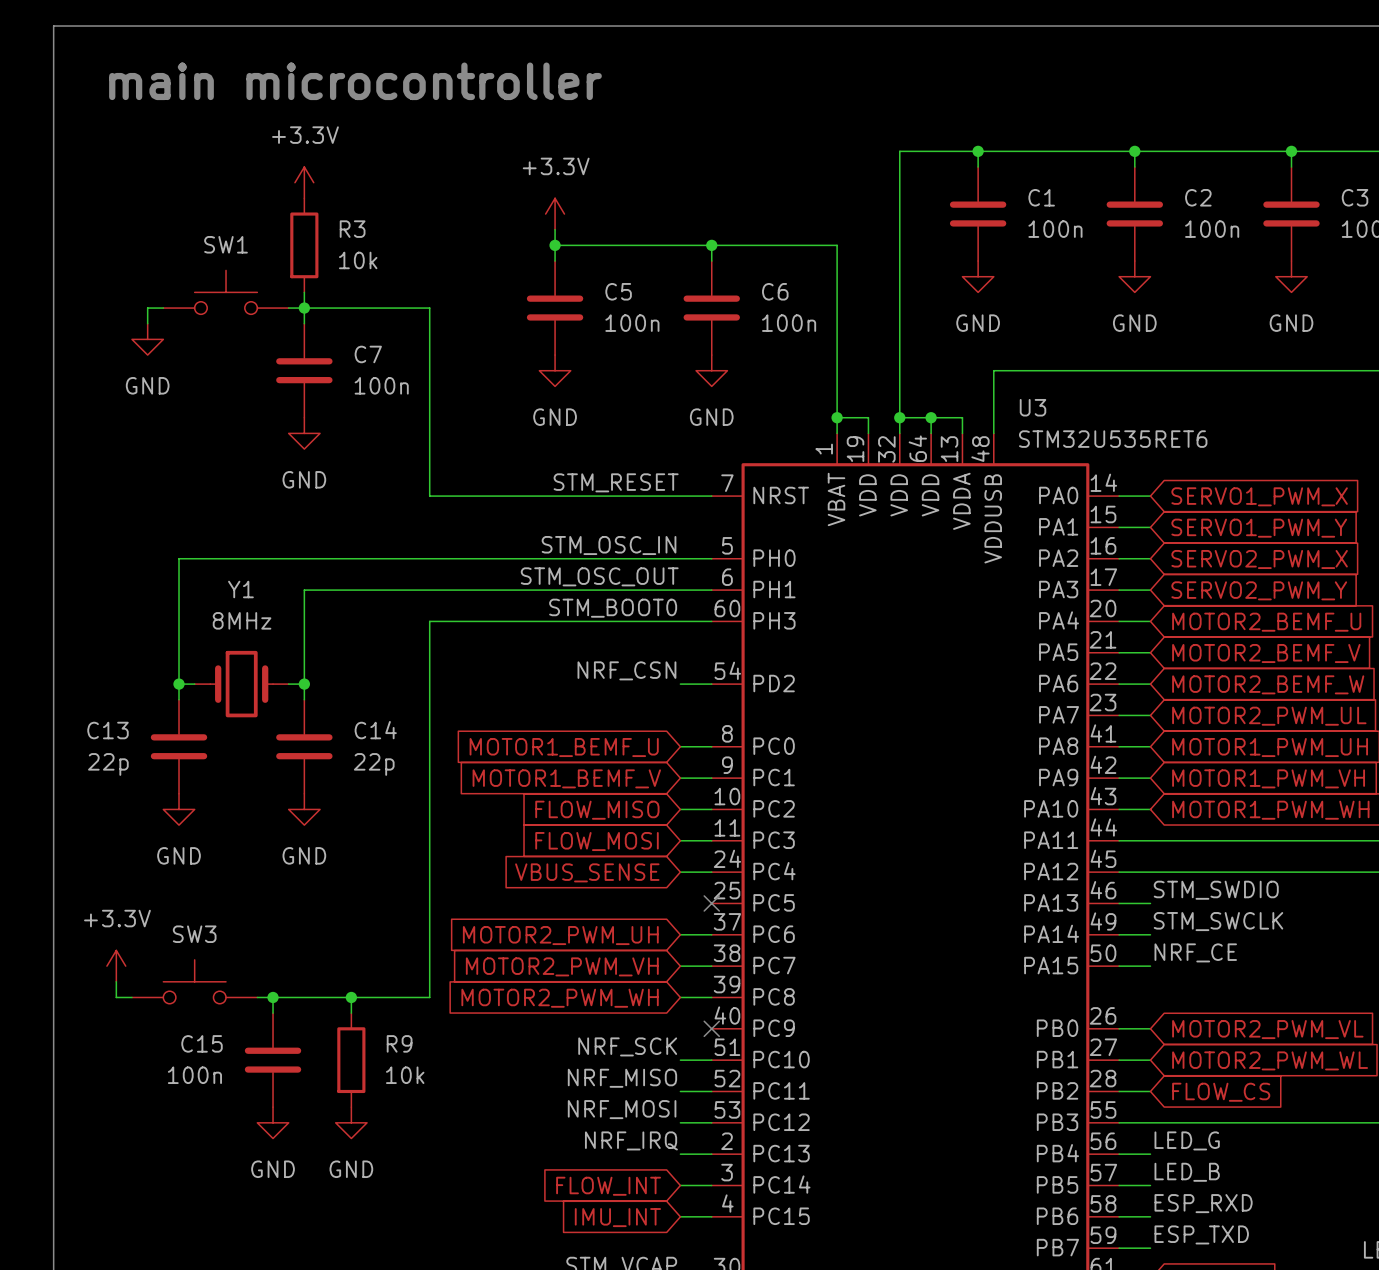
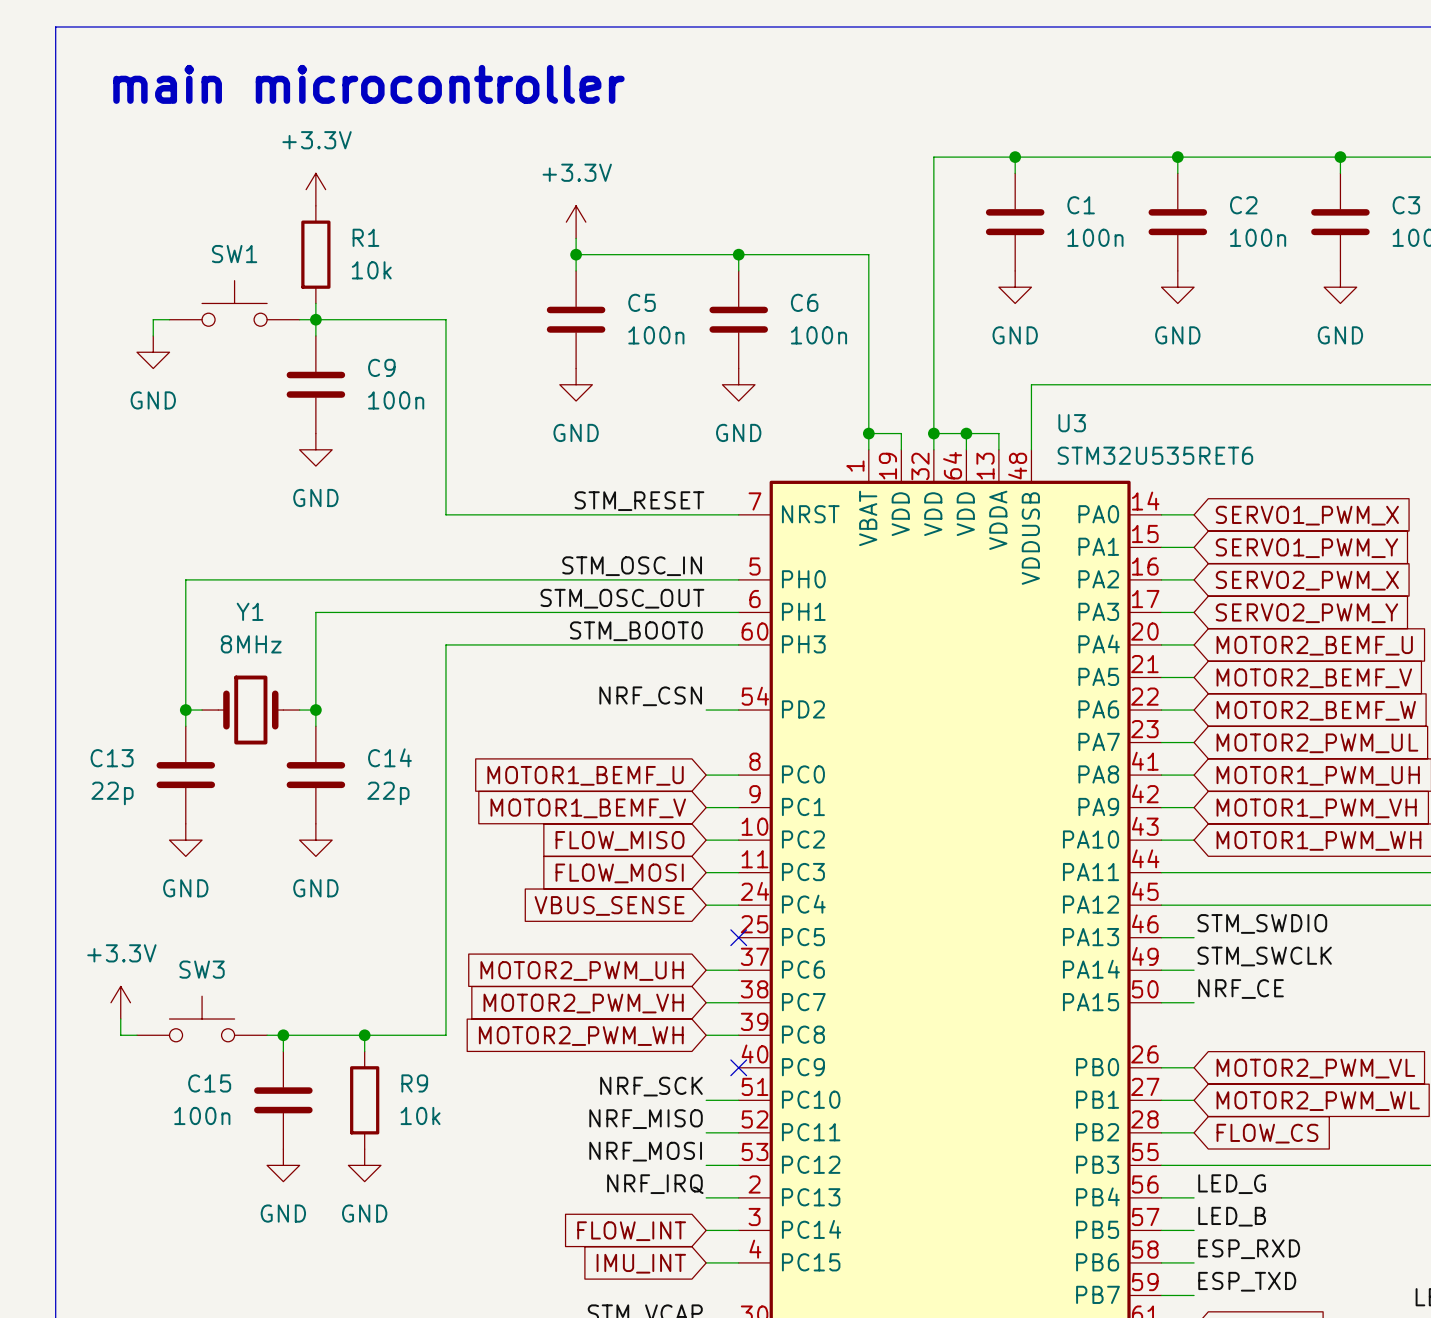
R3 name: R3 (352, 229) -> R1 (365, 237)
C7 name: C7 (368, 354) -> C9 (381, 367)

